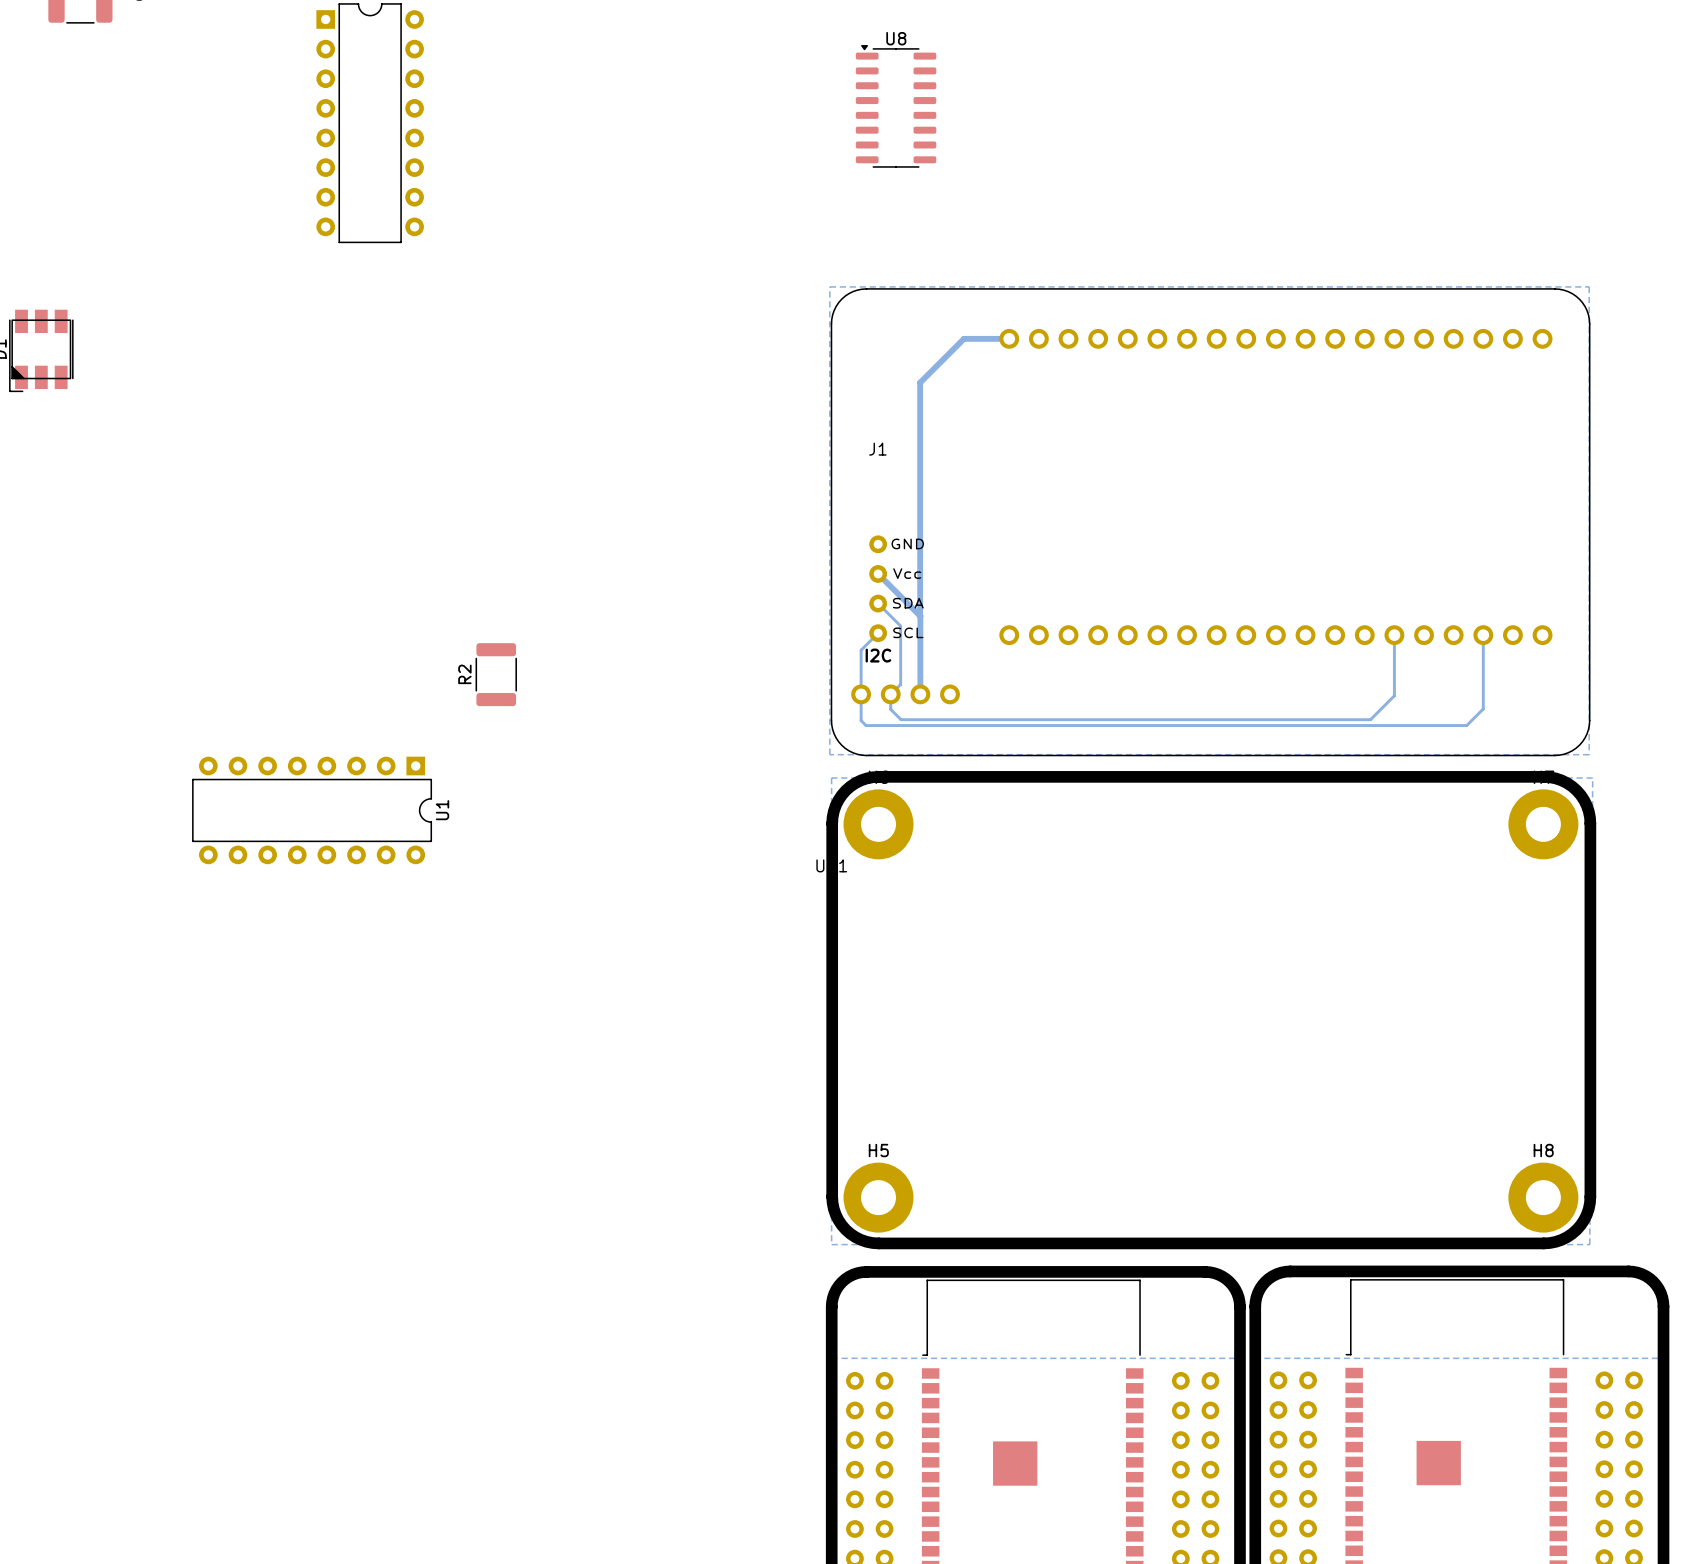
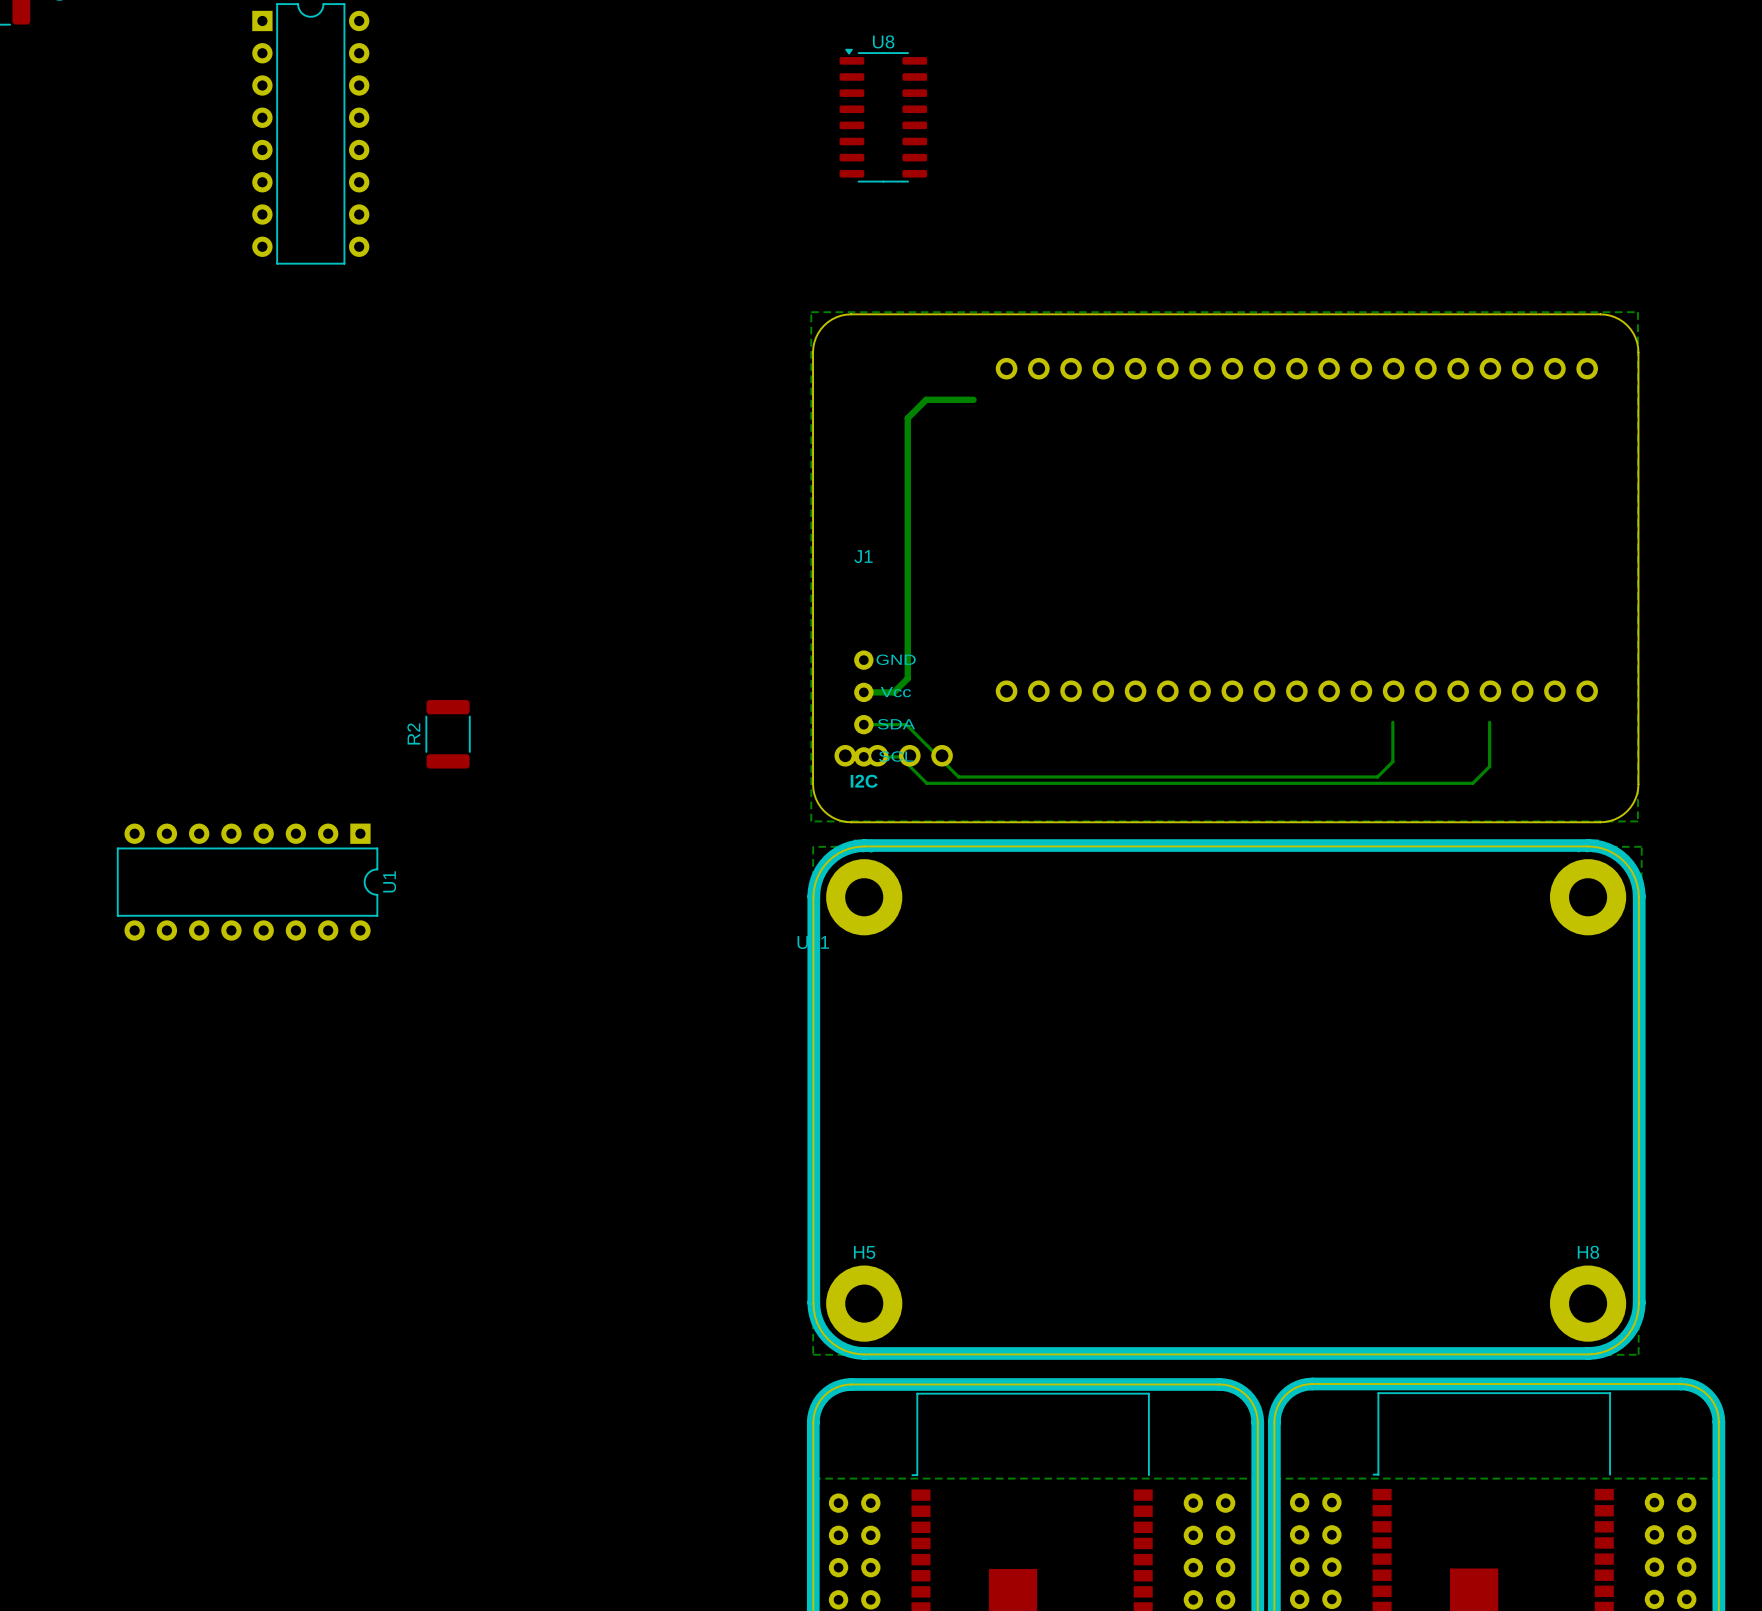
bottom track: (1009, 338) (963, 338) (935, 367) -> (973, 399) (926, 399)
bottom track: (920, 382) (920, 615) -> (909, 416) (907, 418) (907, 678) (893, 692) (863, 692)
bottom track: (878, 573) (920, 616) (920, 694) -> none
J1 position: (878, 588) -> (863, 708)
bottom track: (878, 603) (900, 626) (900, 684) (890, 694) (890, 709) (901, 719) (936, 719) -> (863, 756) (900, 756) (926, 783)
bottom track: (878, 633) (861, 650) (861, 720) (866, 725) (1466, 725) (1483, 708) (1483, 635) -> none
bottom track: (1394, 635) (1394, 695) (1370, 719) -> (1489, 722) (1489, 766) (1472, 783) (1399, 783)
bottom track: none -> (1392, 722) (1392, 761) (1377, 776) (958, 776) (906, 724) (863, 724)

